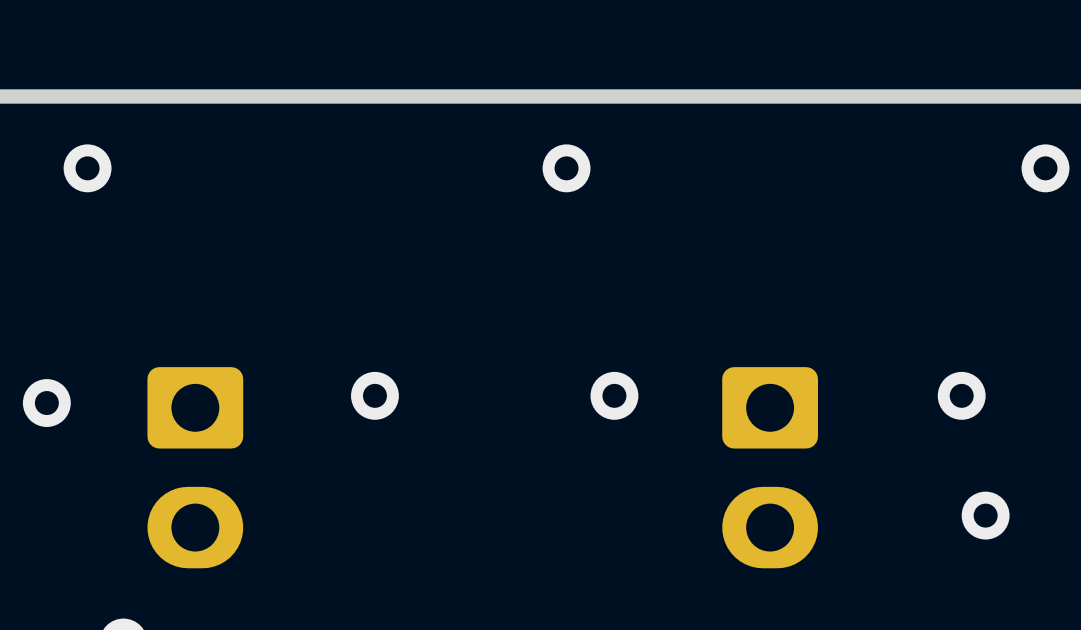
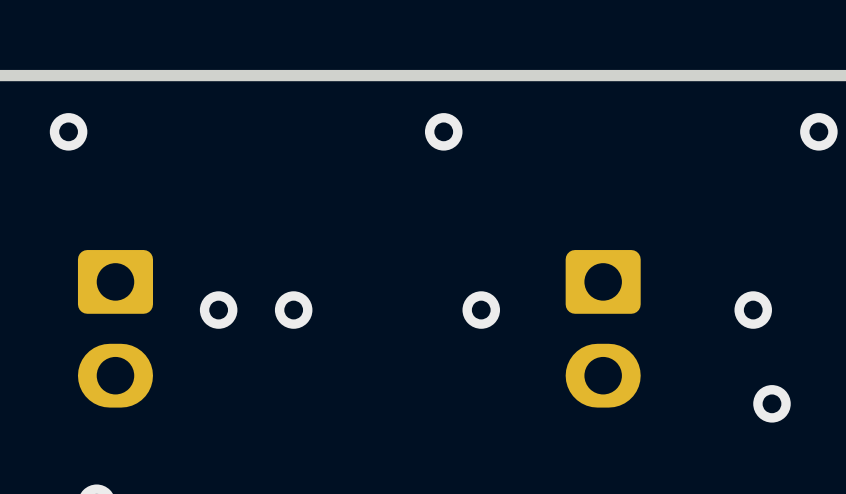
via position: (46, 403) -> (218, 310)
part position: (195, 467) -> (115, 328)
part position: (770, 467) -> (603, 328)

